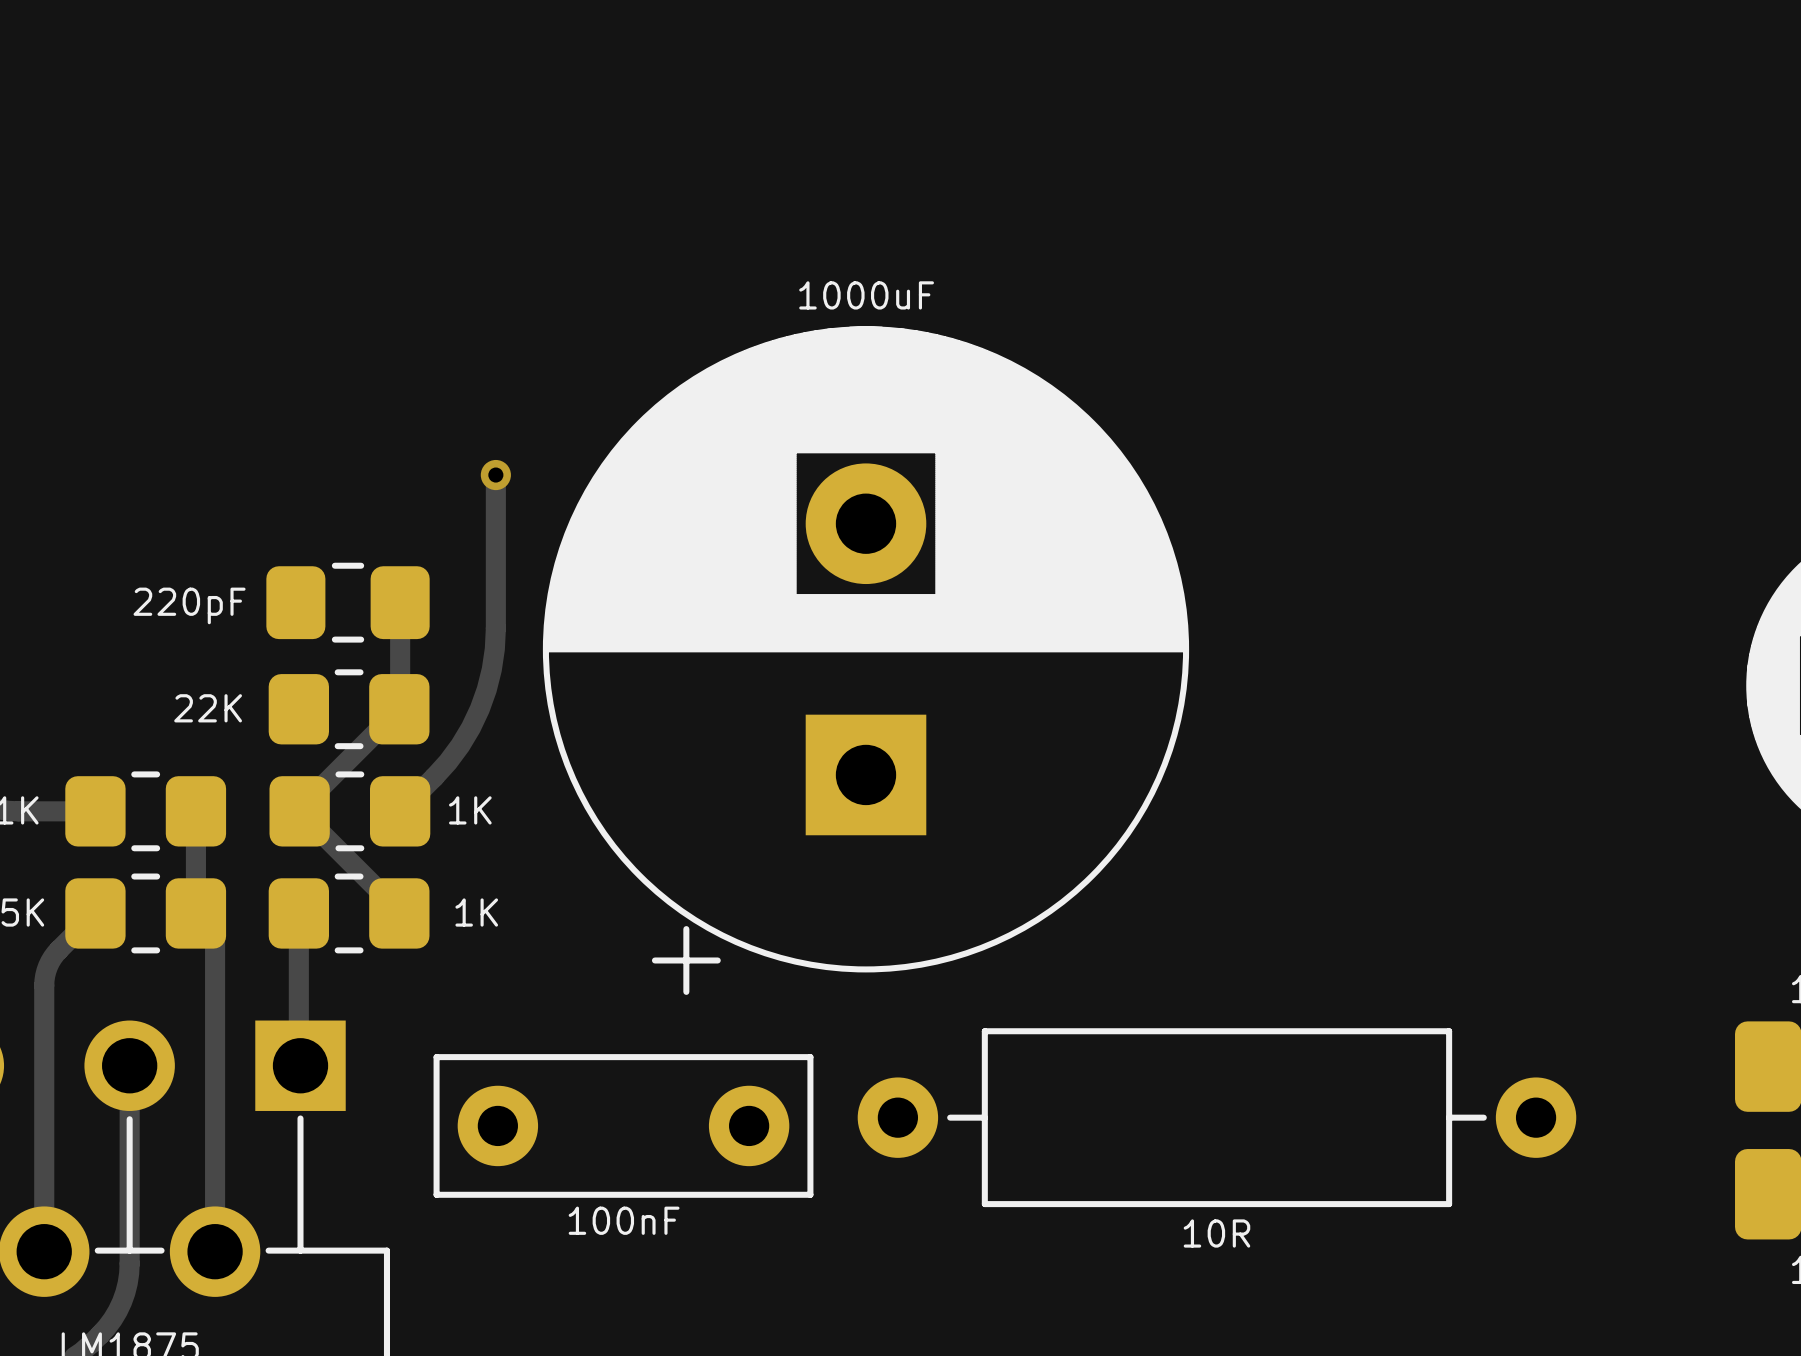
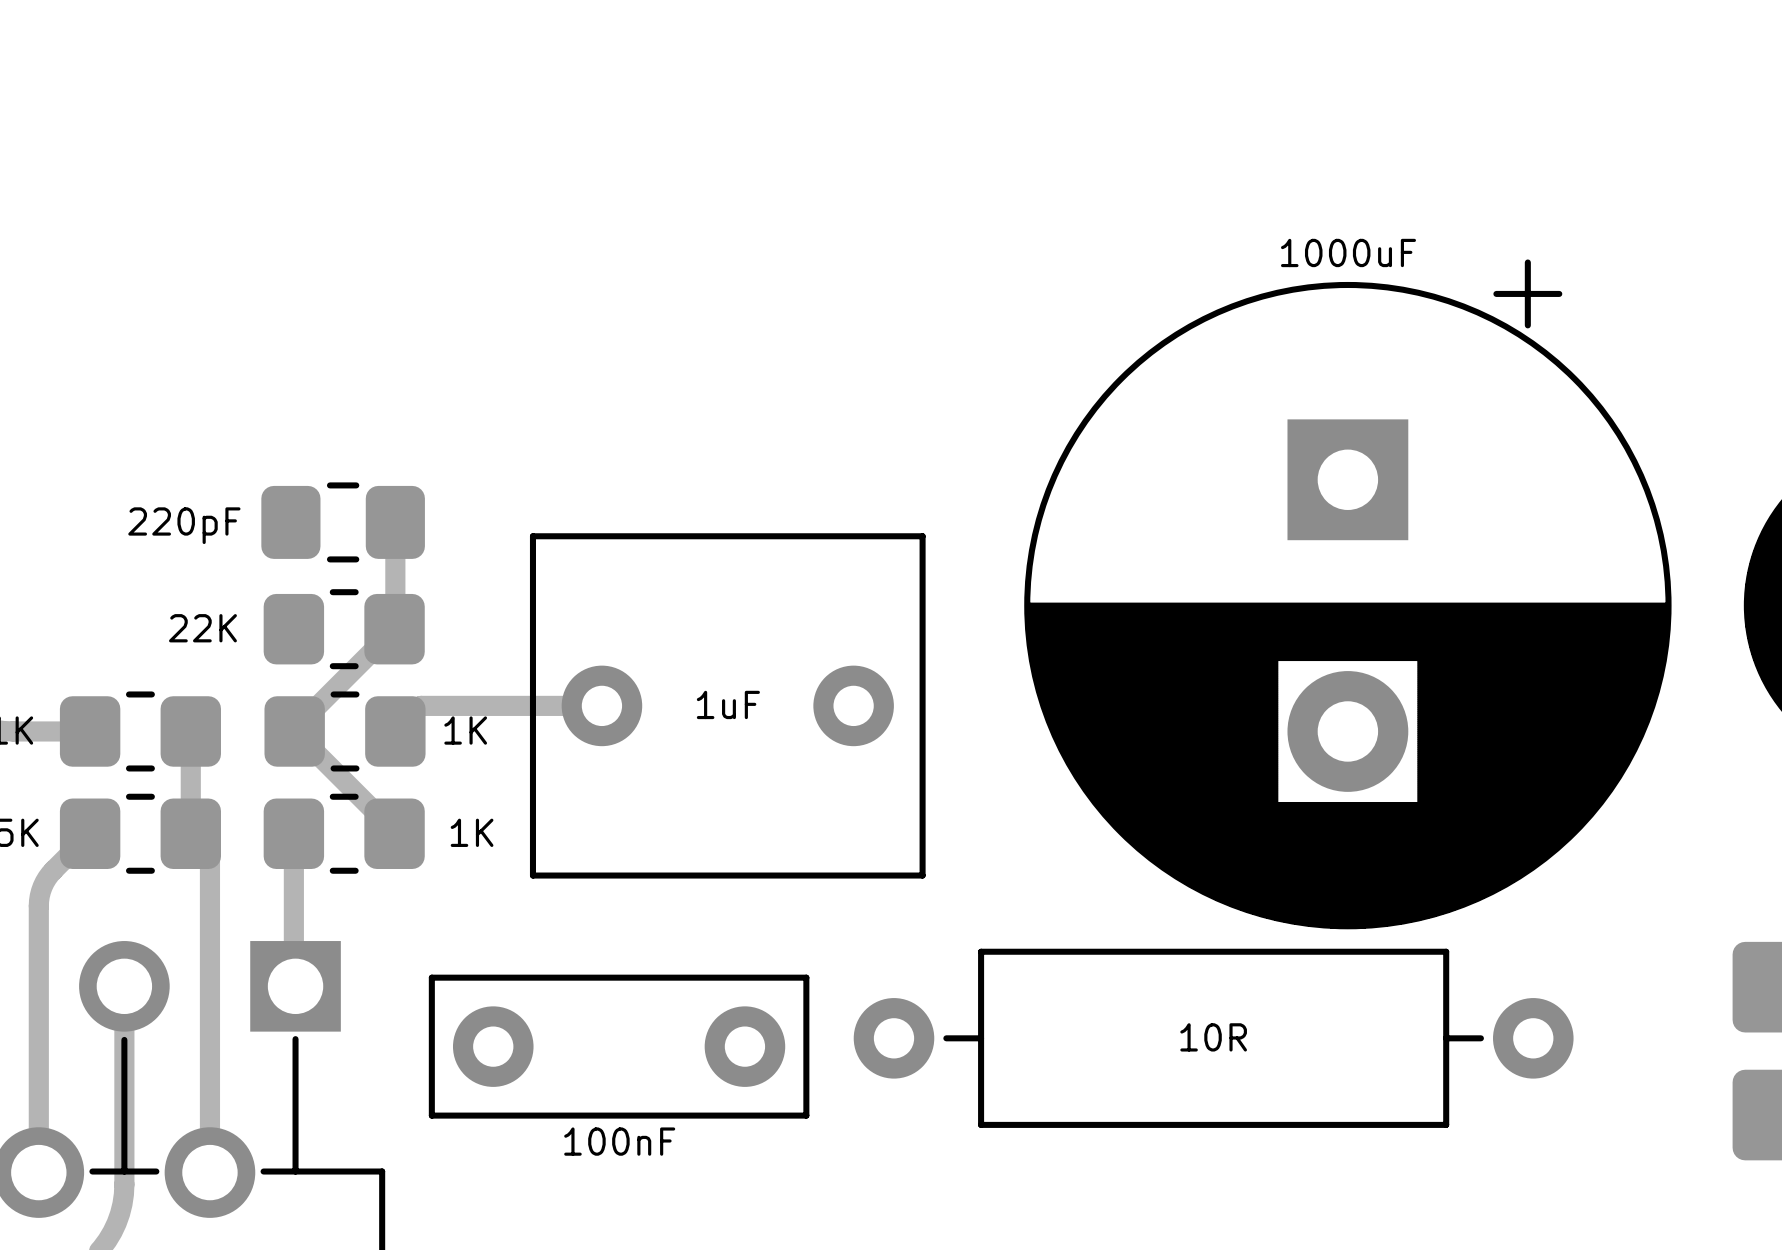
track: (495, 475) (495, 628) (491, 669) (486, 689) (470, 727) (448, 762) (425, 785) -> (601, 705) (420, 705)
via: (495, 475) -> none
part rotation: 0° (865, 660) -> 180° (1347, 594)
part position: (865, 660) -> (1347, 594)
part: none -> 1uF (727, 705)
part value position: 10R (1216, 1233) -> 10R (1213, 1037)

